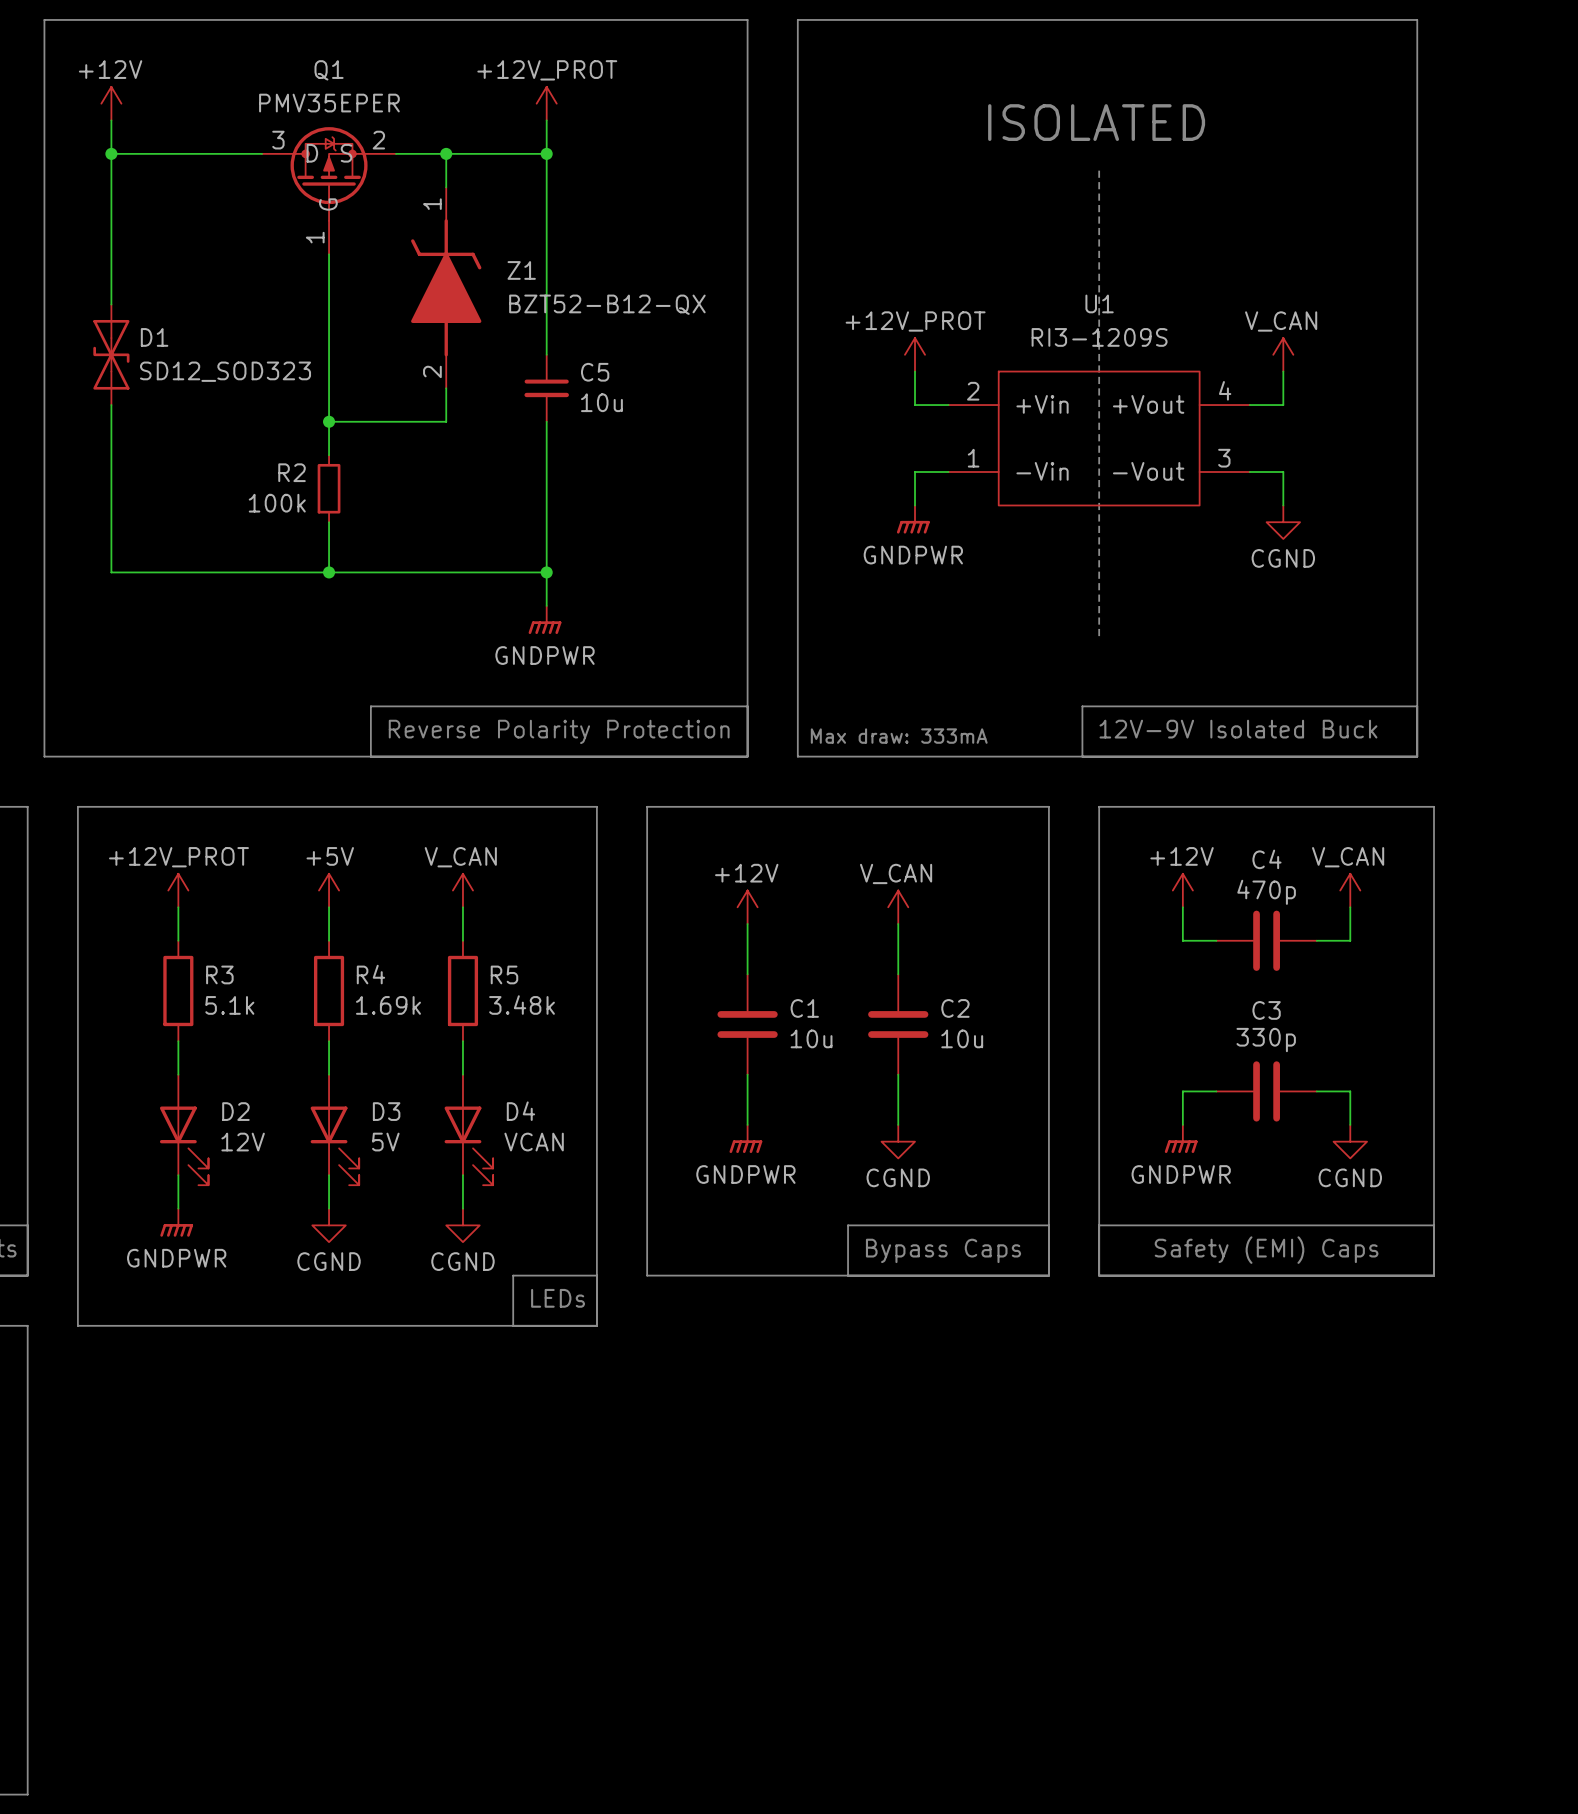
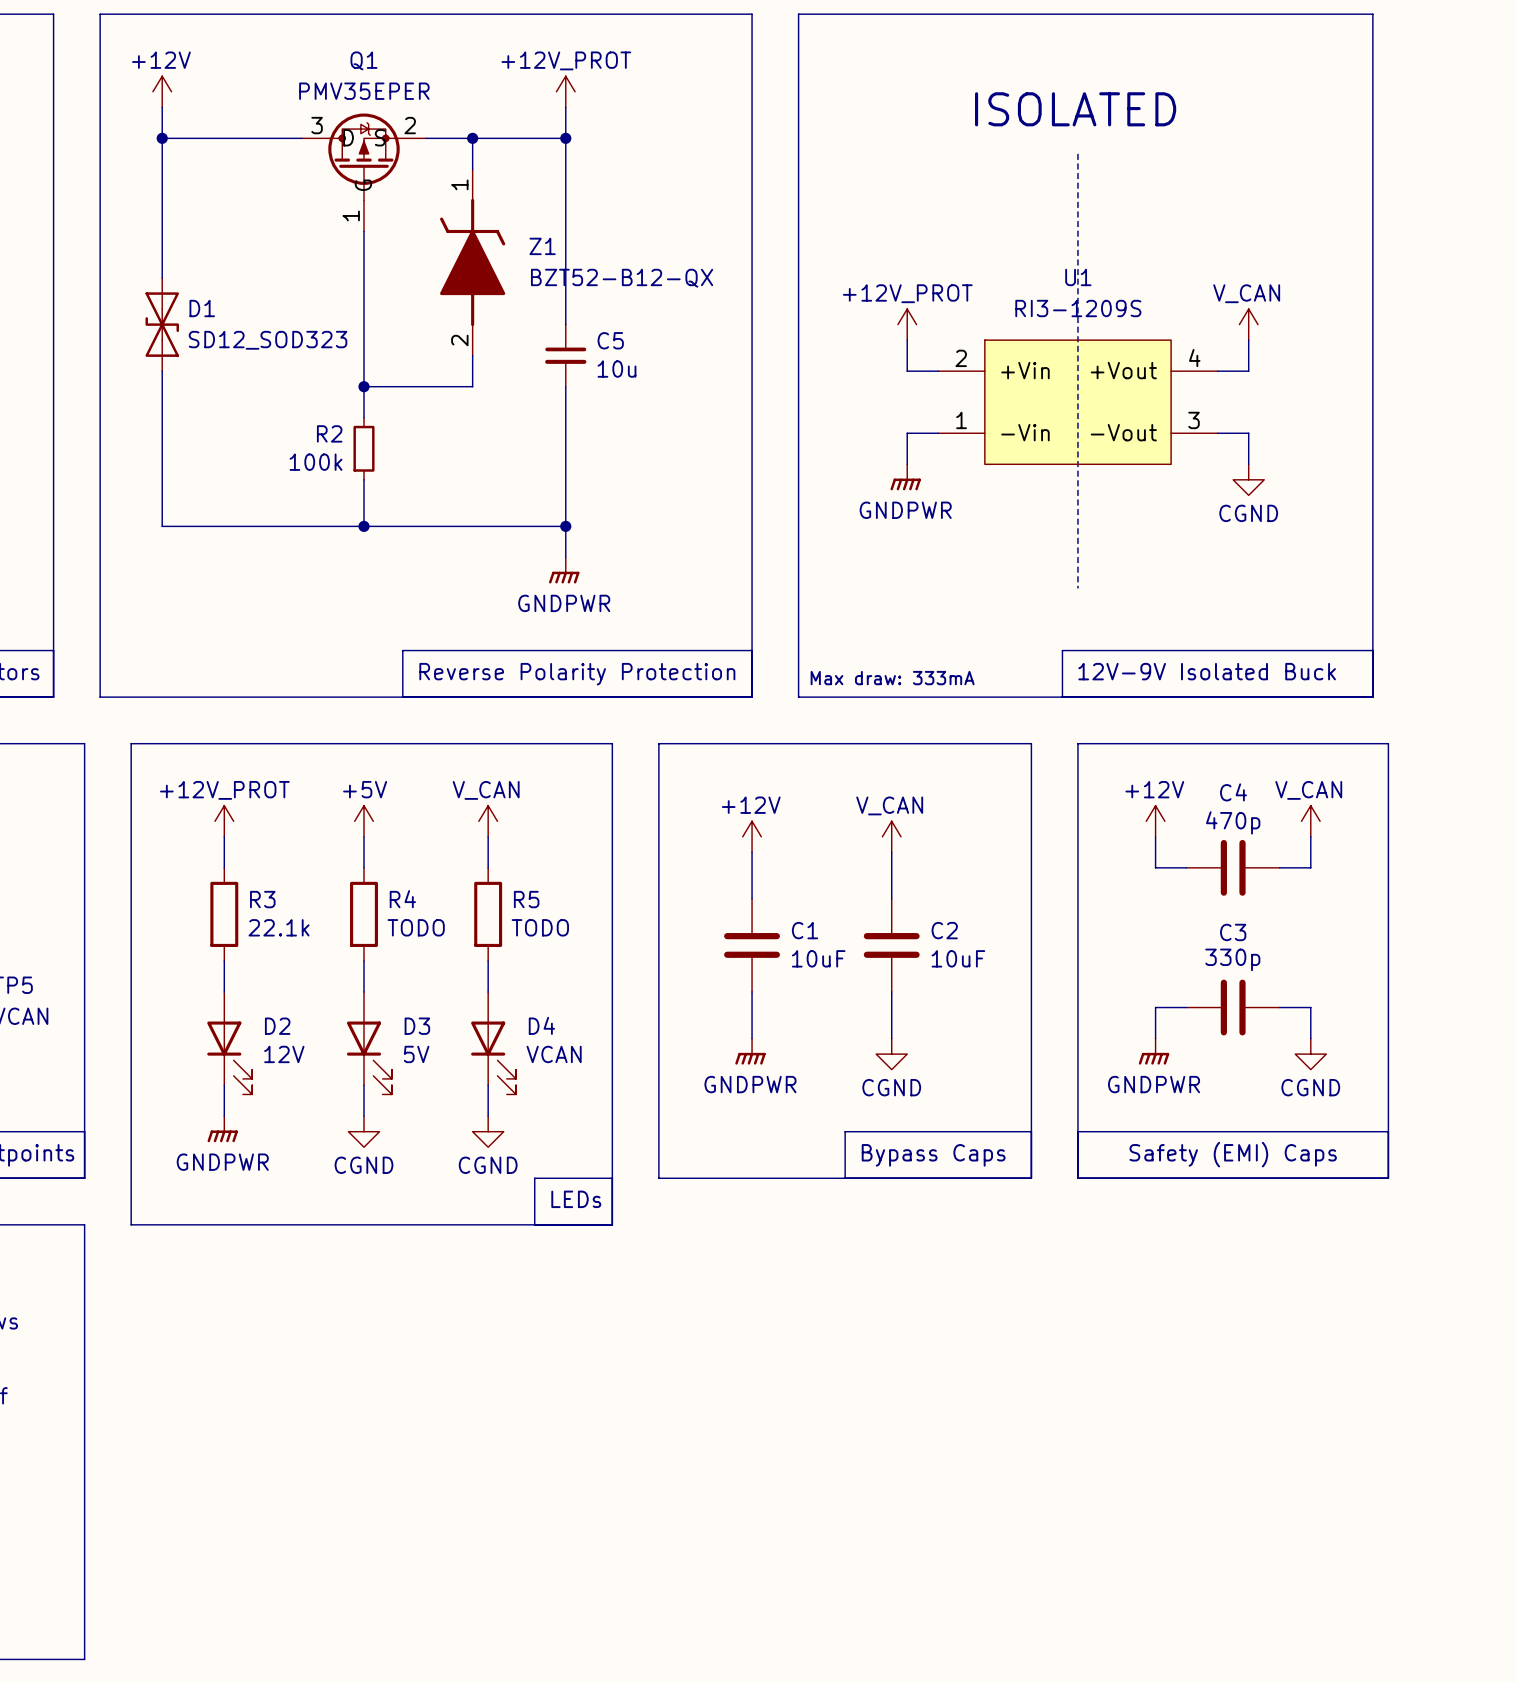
R3 value: 5.1k (229, 1005) -> 22.1k (279, 927)
R4 value: 1.69k (388, 1005) -> TODO (416, 927)
R5 value: 3.48k (522, 1005) -> TODO (540, 927)
C1 value: 10u (811, 1038) -> 10uF (818, 958)
C2 value: 10u (962, 1038) -> 10uF (958, 958)

